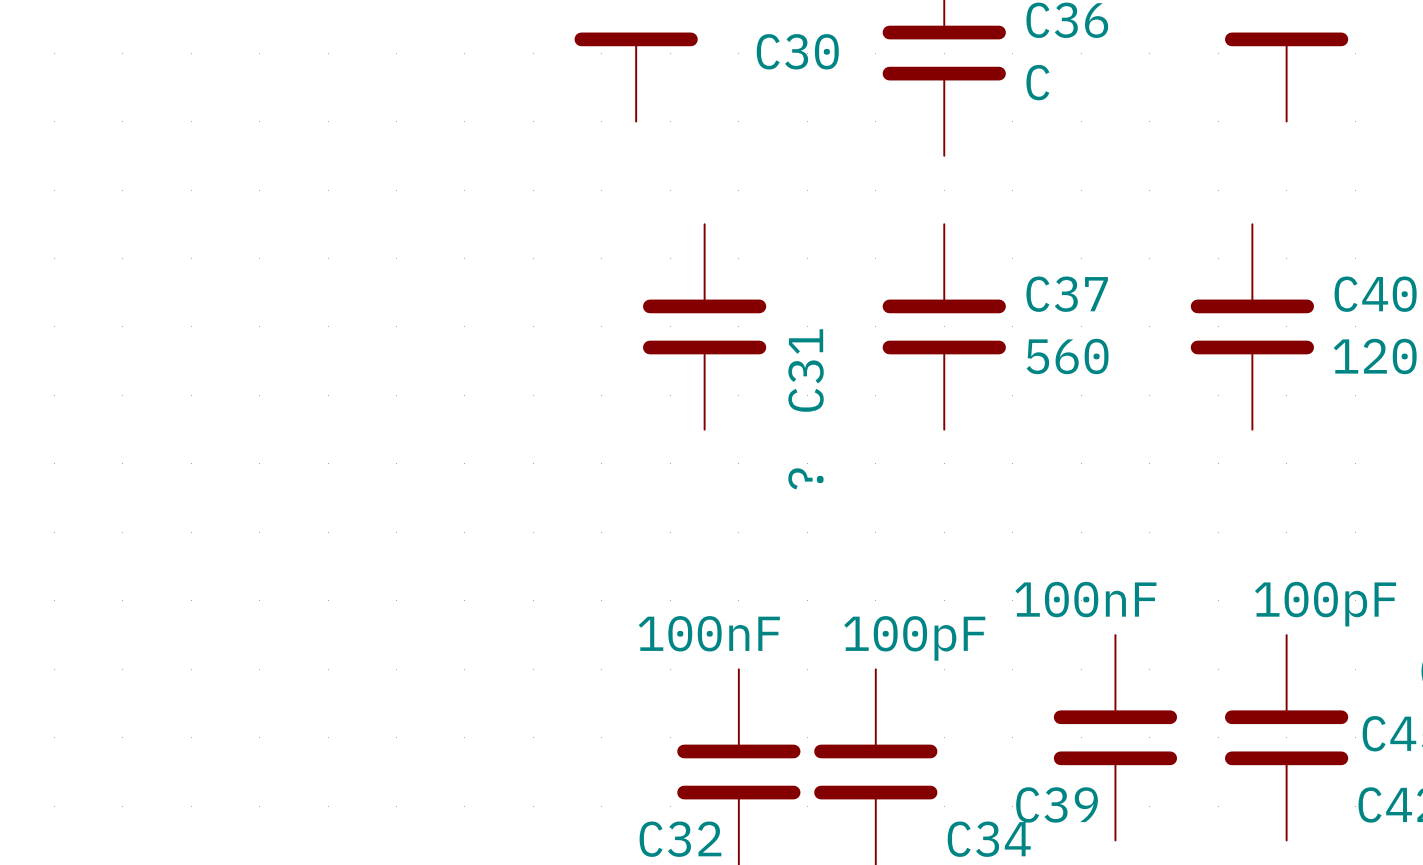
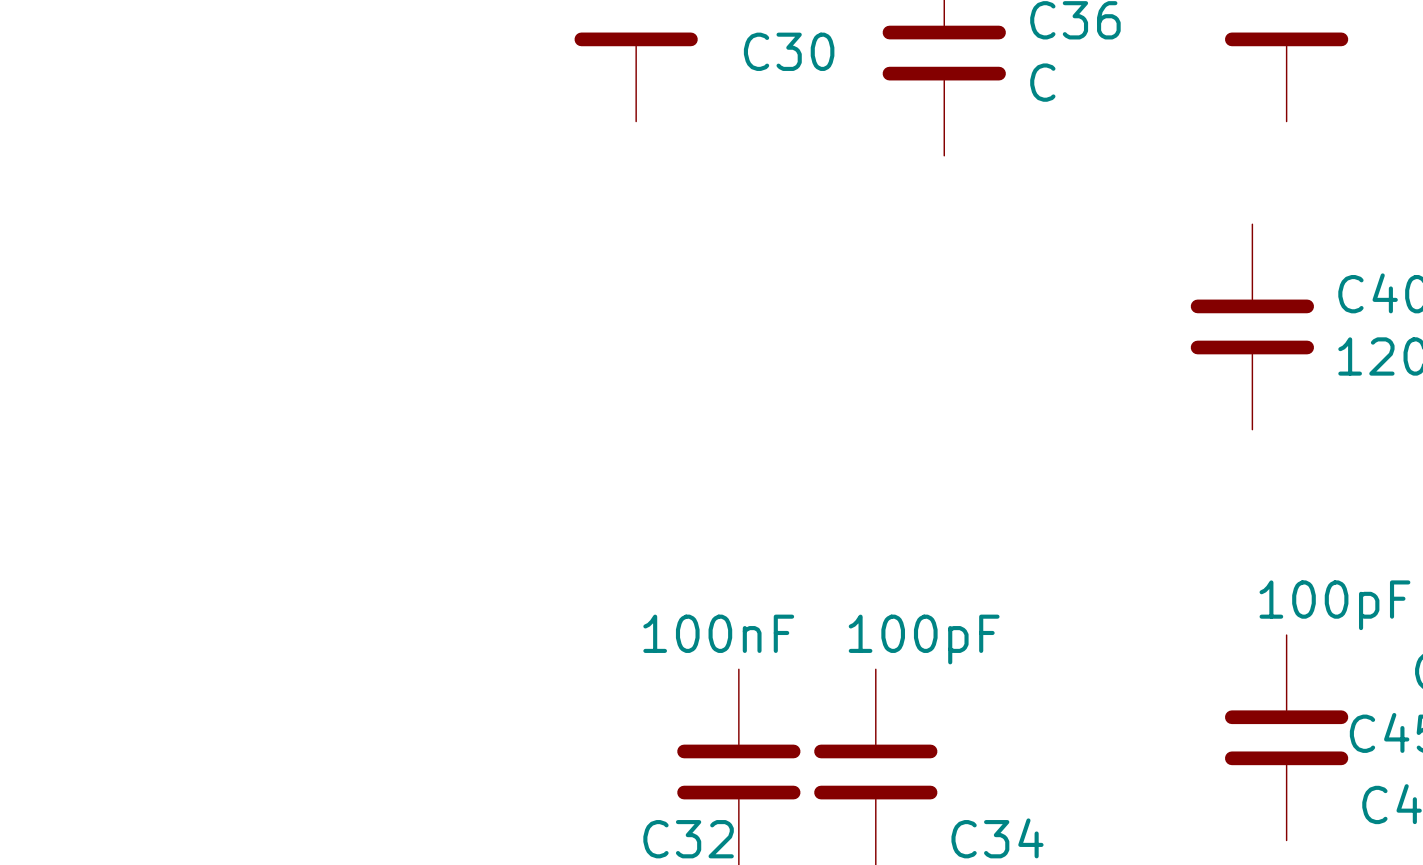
C31: ? (704, 326) -> none
C37: 560 (944, 326) -> none
C39: 100nF (1115, 737) -> none

